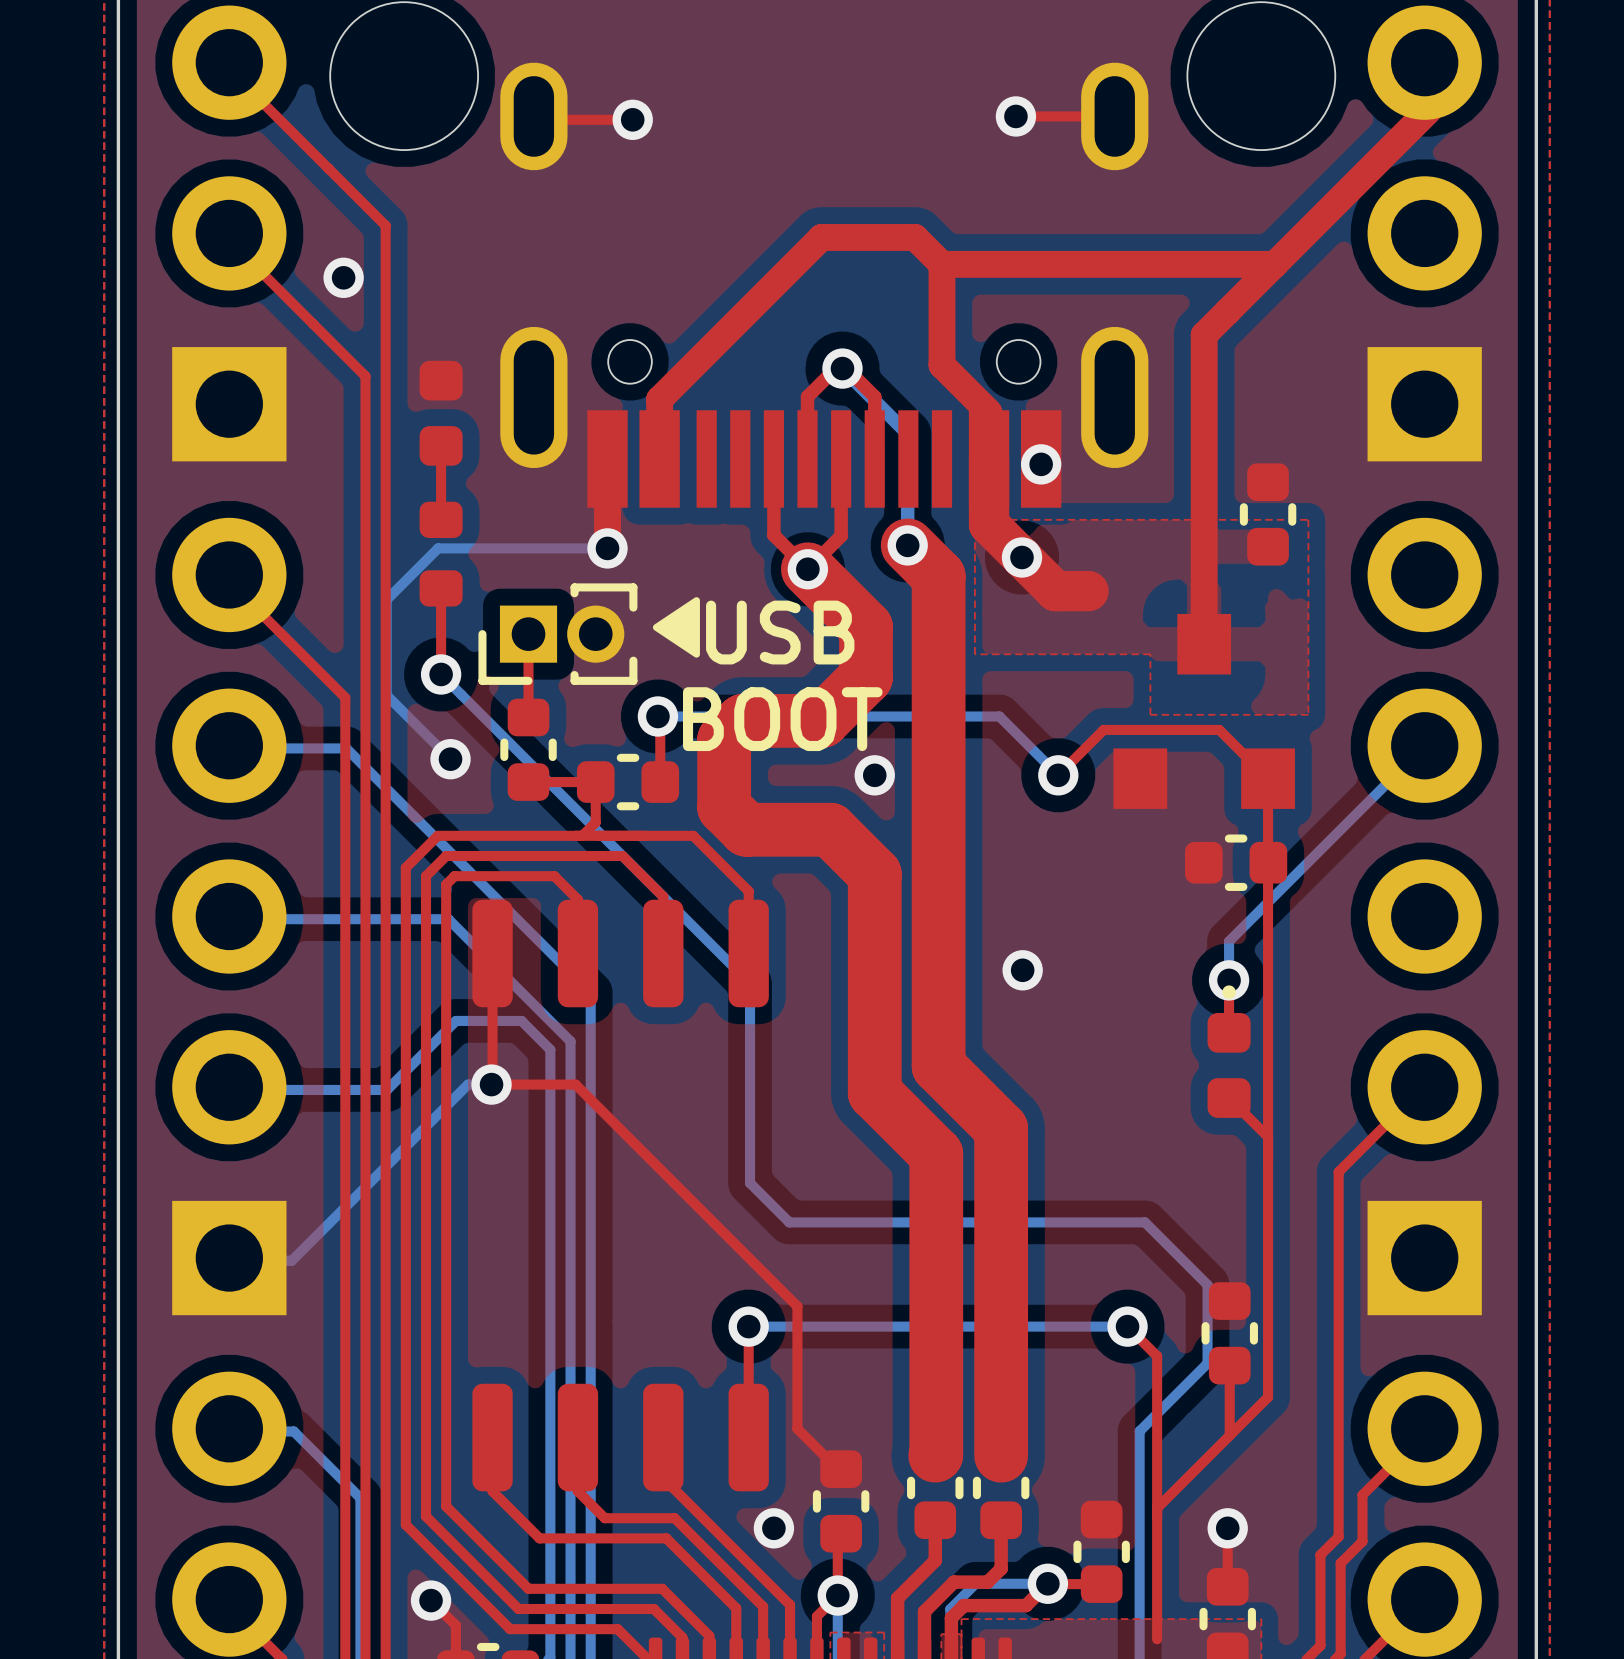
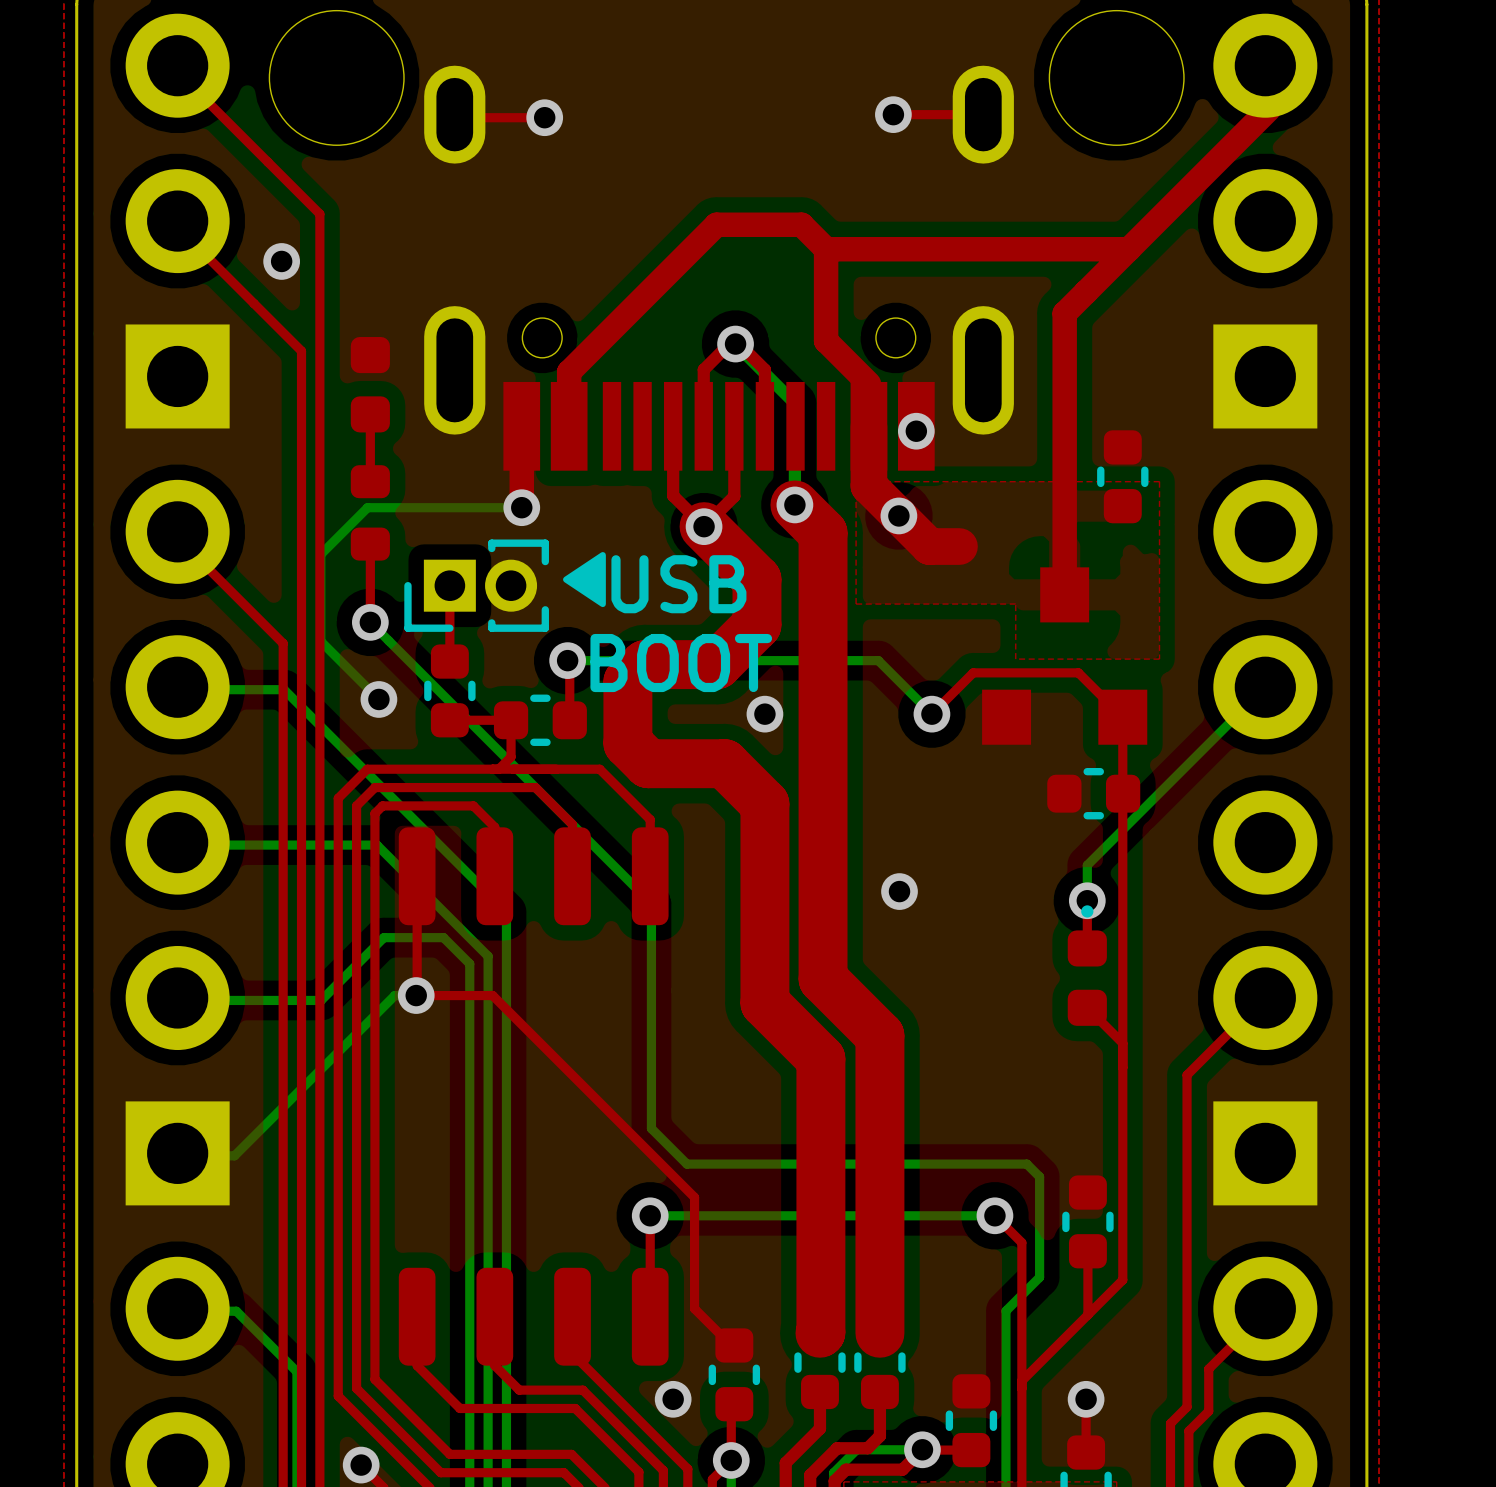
bottom track: (750, 1183) (789, 1222) (1145, 1222) (1207, 1284) (1207, 1363) (1176, 1394) -> (651, 1085) (651, 1128) (686, 1164) (1026, 1164) (1039, 1176) (1039, 1277)

